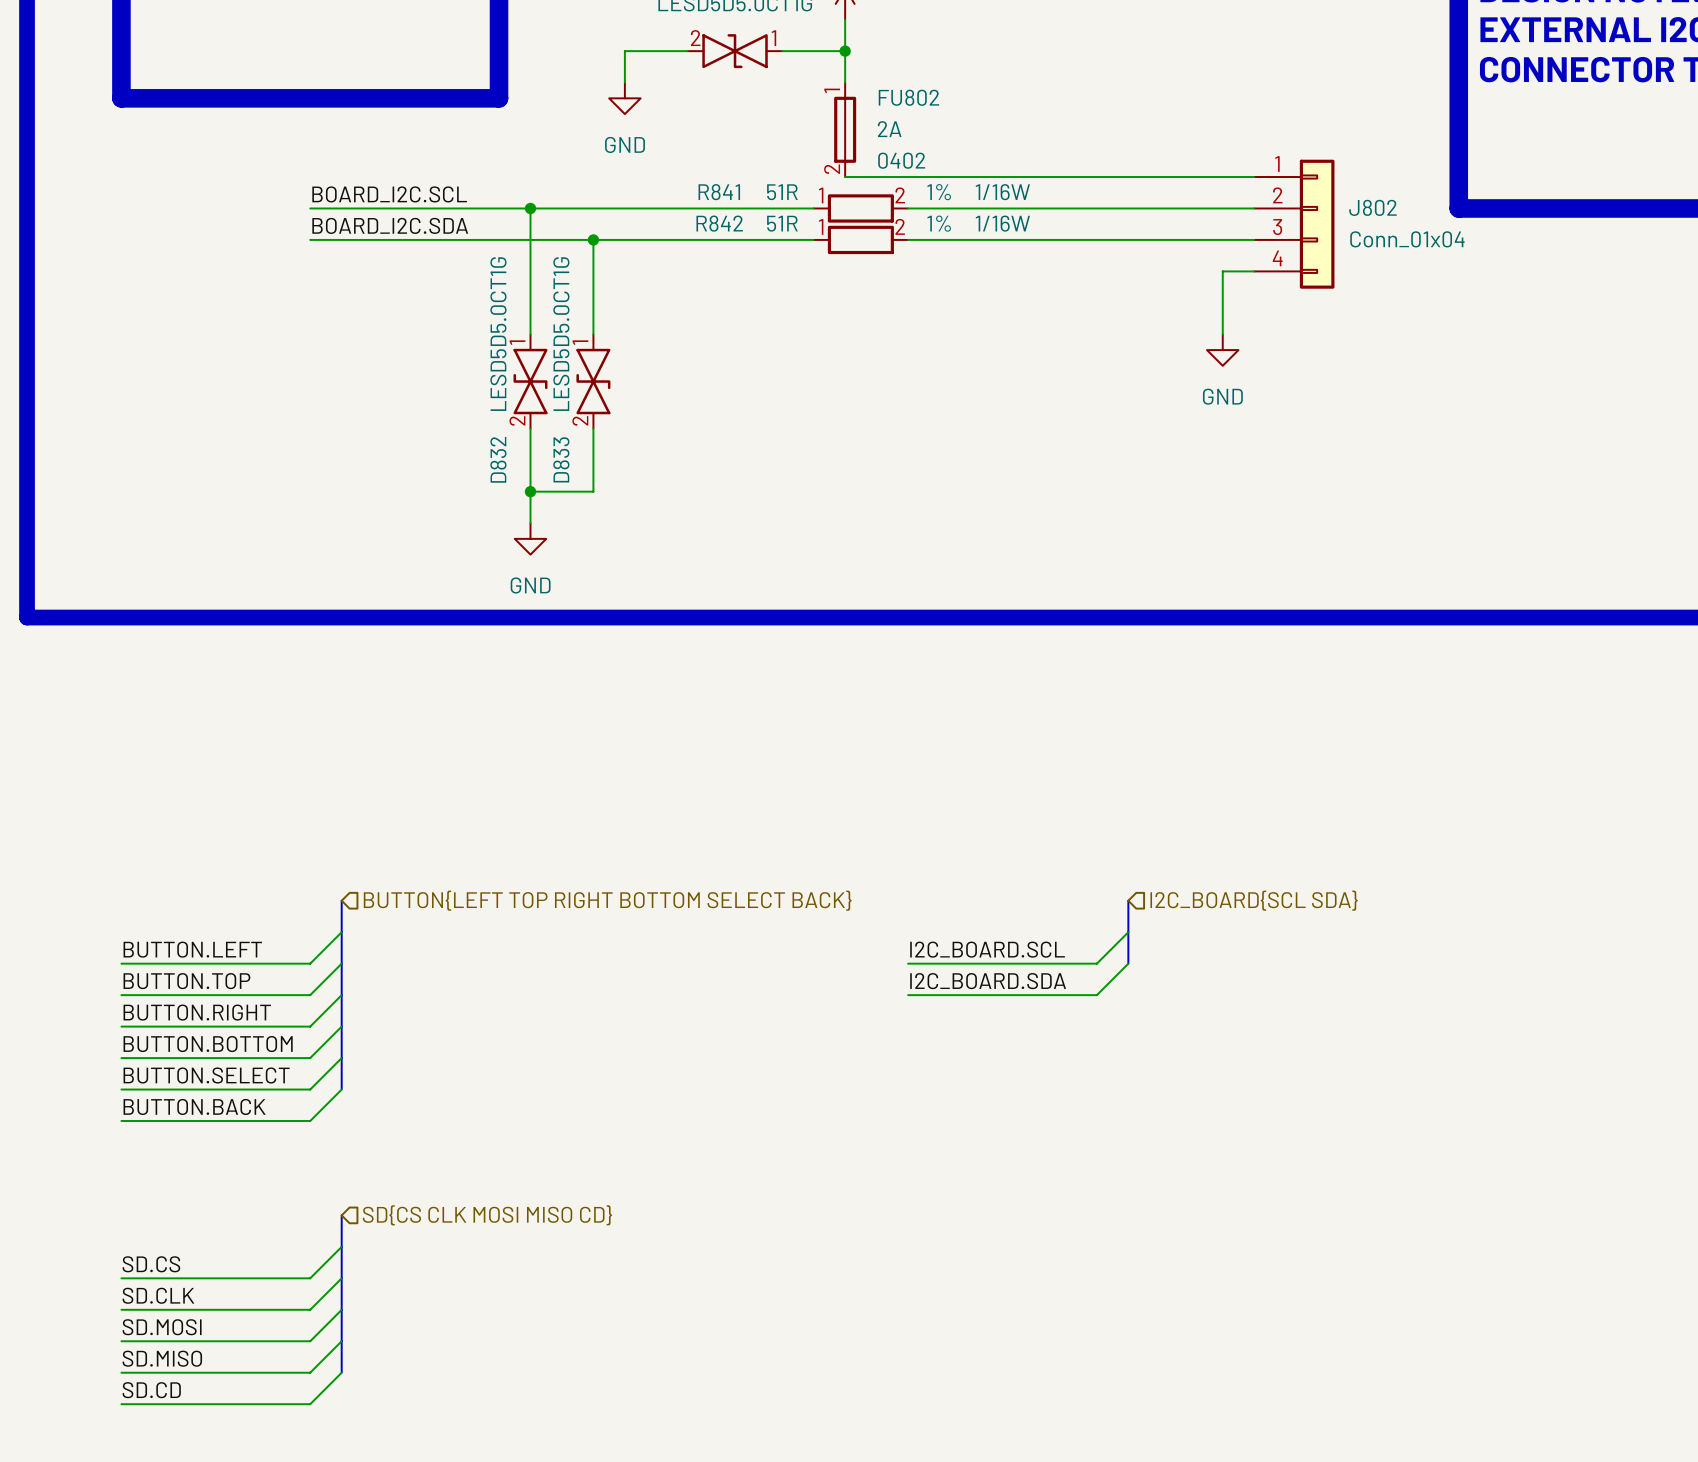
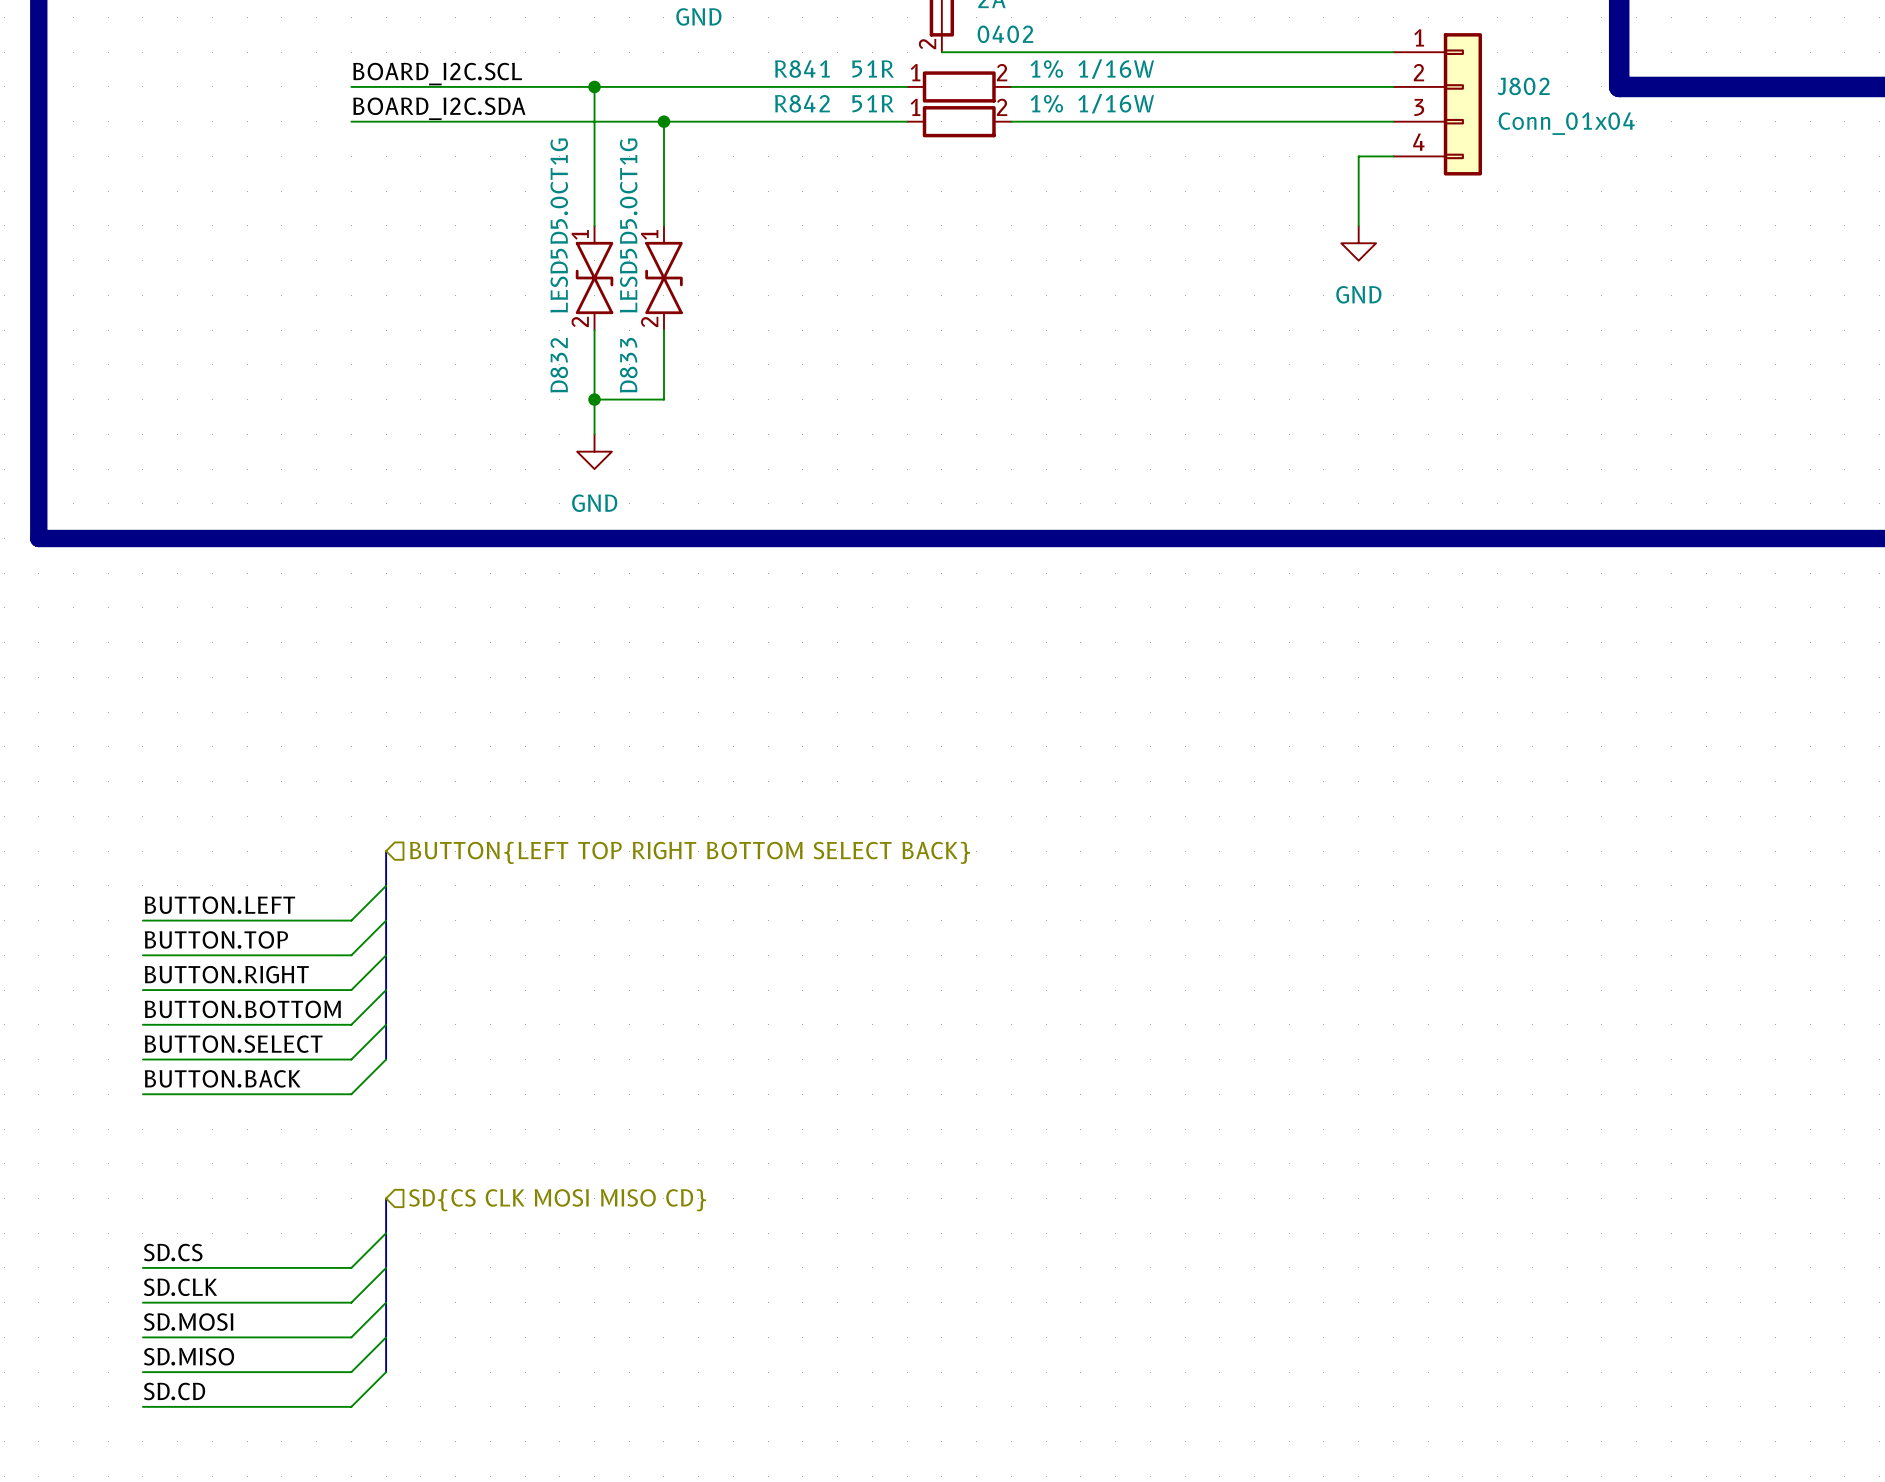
bus: (1128, 900) (1128, 963) -> none
hierarchical label: I2C_BOARD{SCL SDA} (1254, 900) -> none
wire: (1128, 932) (1096, 963) (908, 963) -> none
label: I2C_BOARD.SCL (987, 949) -> none
wire: (1128, 963) (1096, 995) (908, 995) -> none
label: I2C_BOARD.SDA (988, 981) -> none

